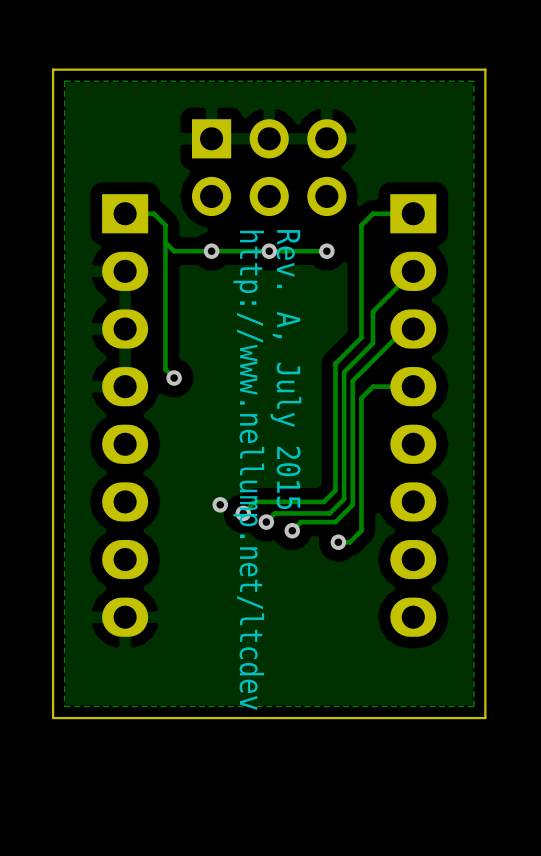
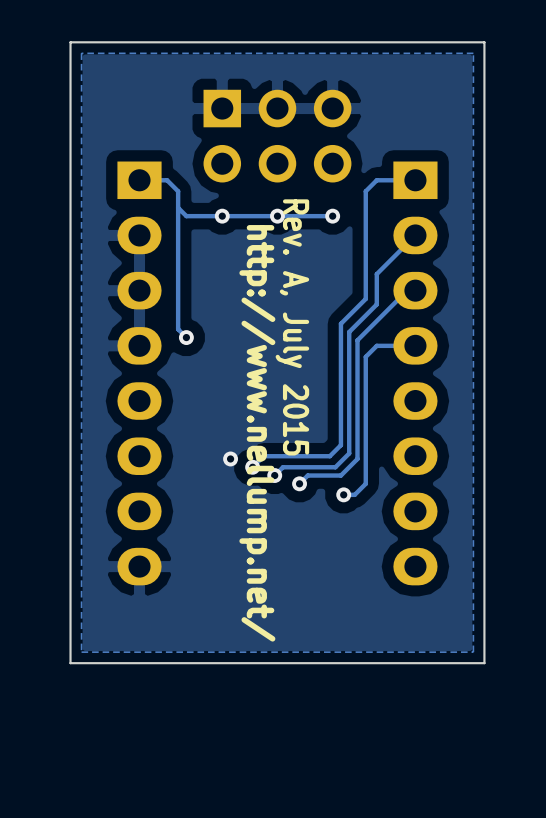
text: http://www.nellump.net/ltcdev (248, 470) -> http://www.nellump.net/ (257, 433)

